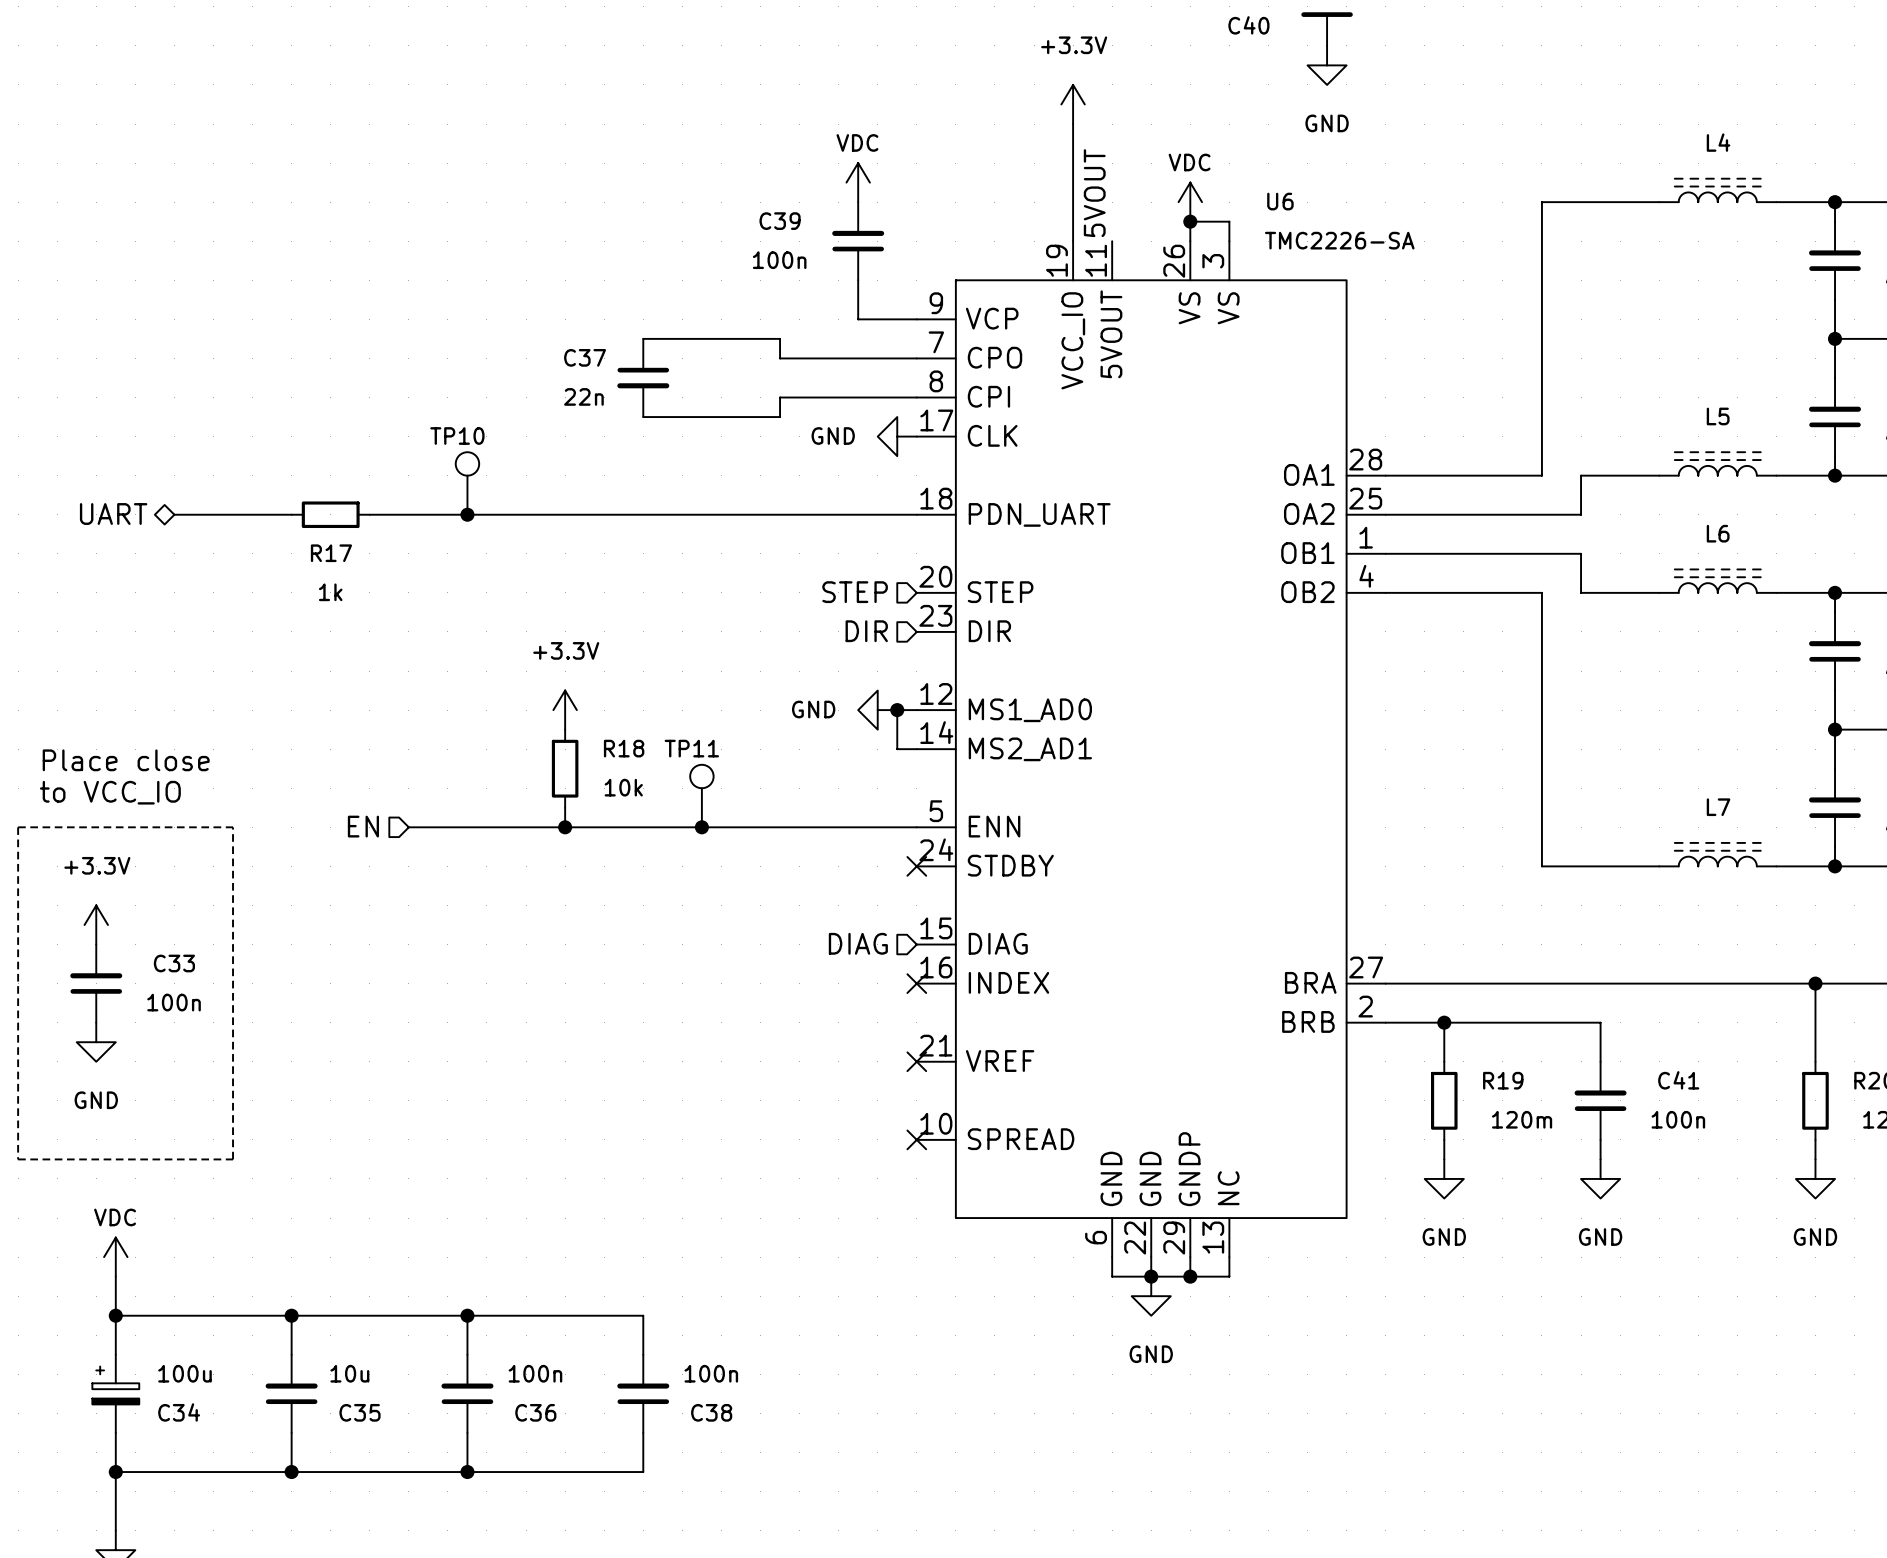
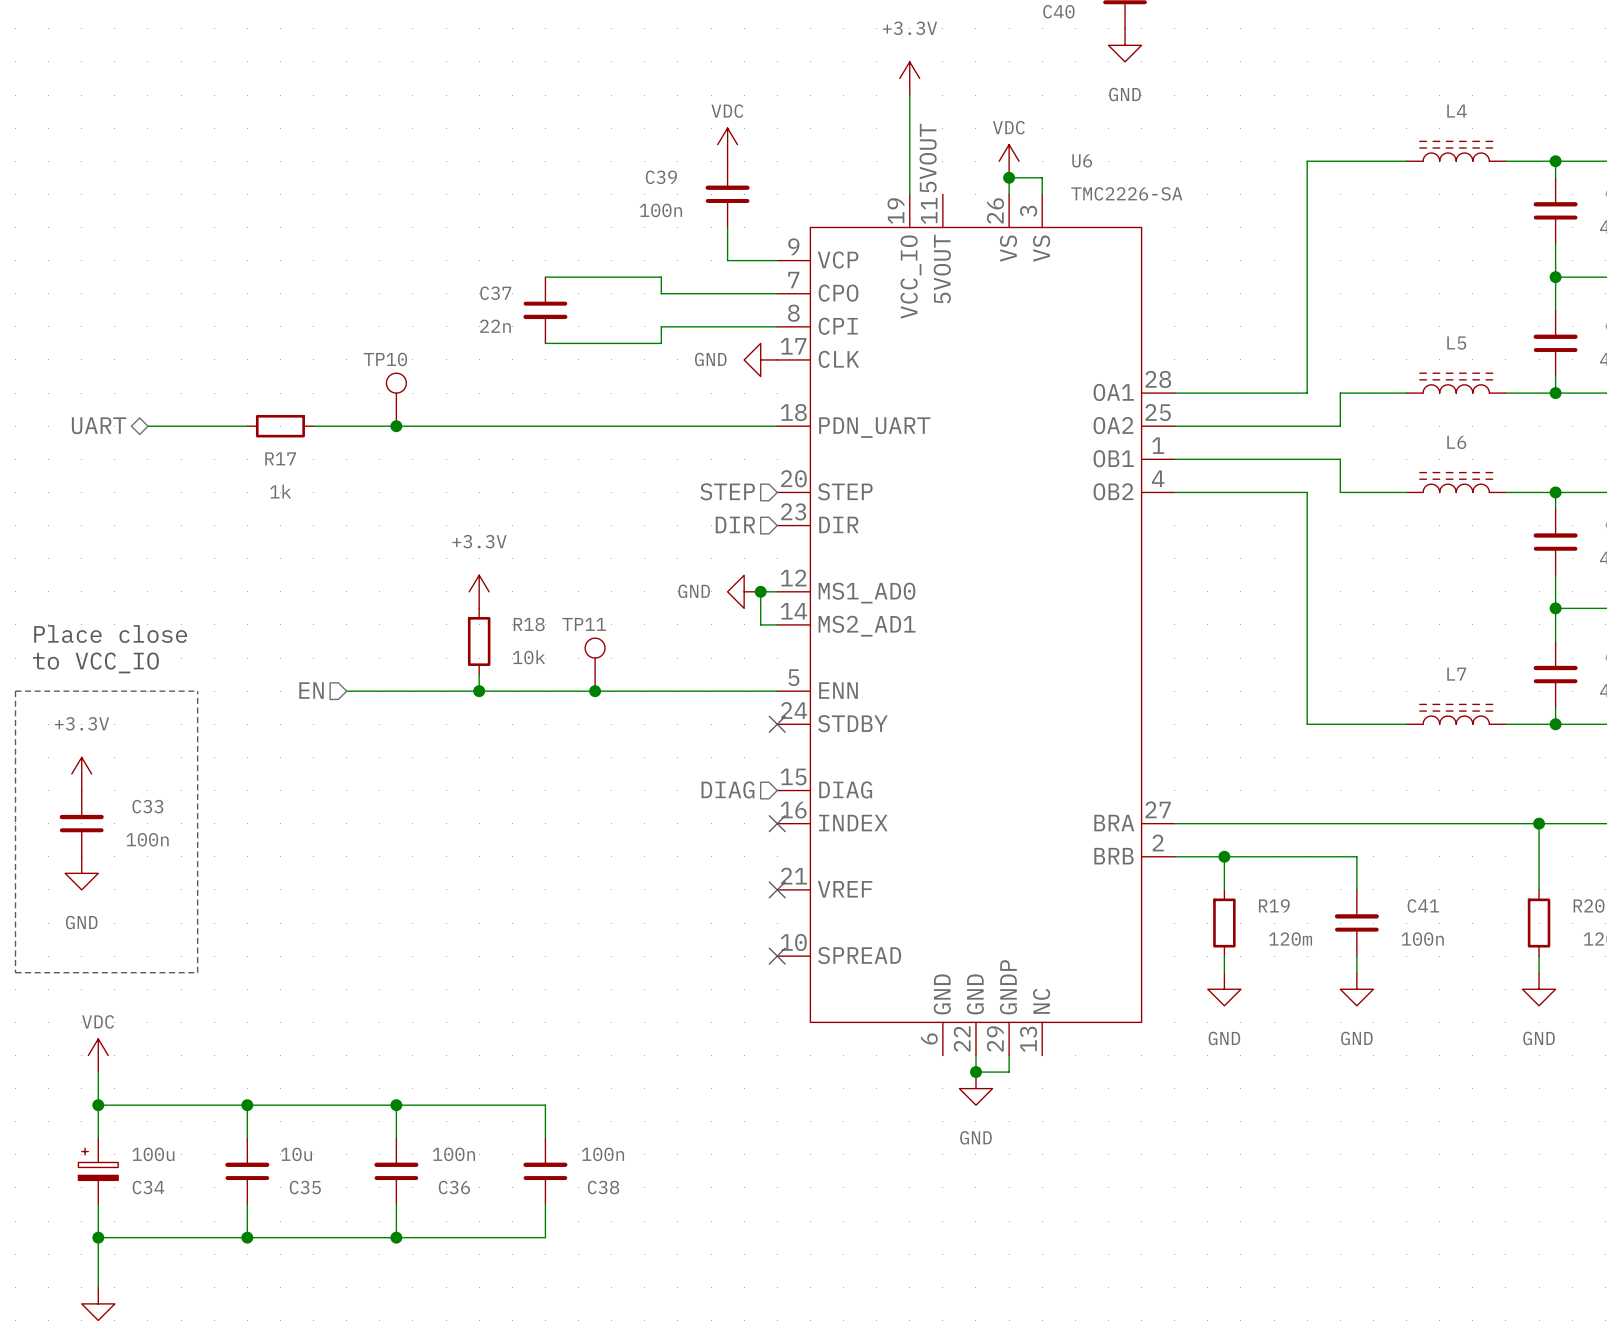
wire: (1112, 1257) (1112, 1276) (1151, 1276) -> none
wire: (1229, 1257) (1229, 1276) (1190, 1276) -> none
junction: (1190, 1276) -> none

